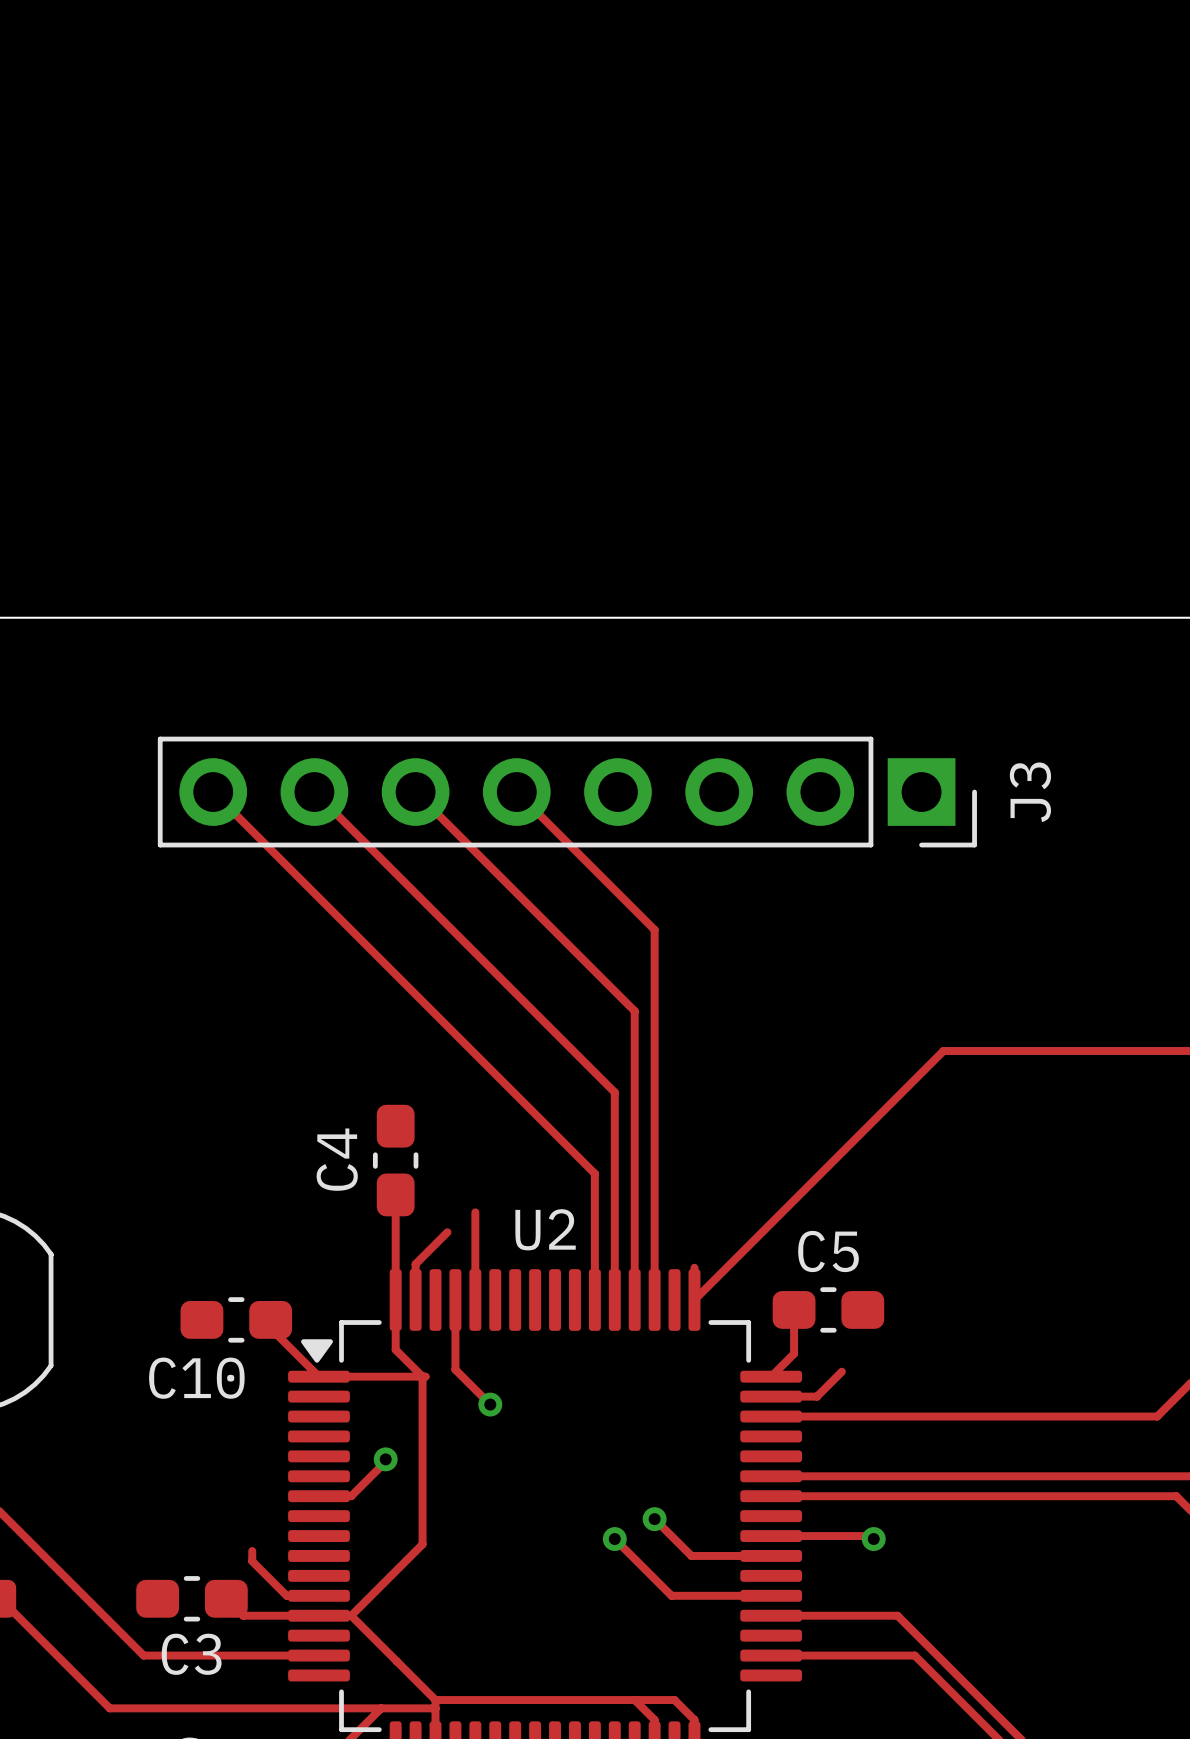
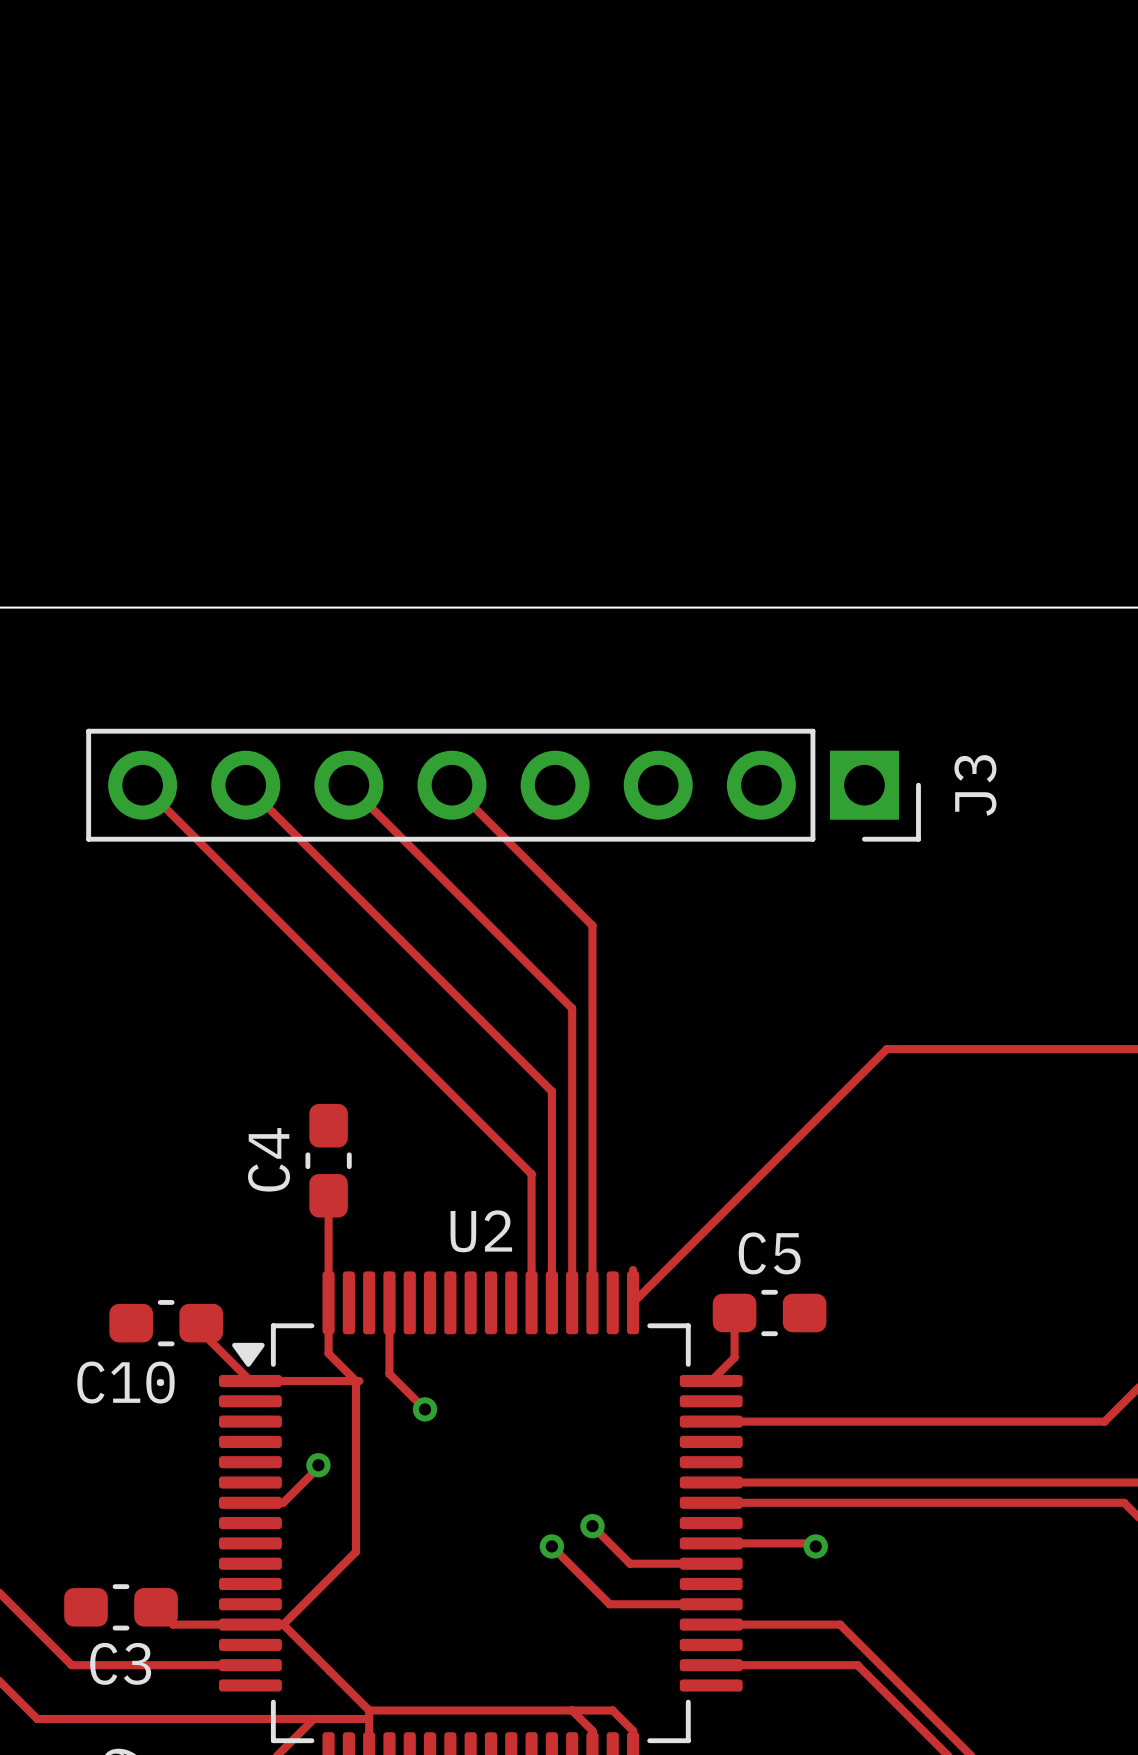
track: (475, 1212) (475, 1299) -> none
track: (447, 1232) (415, 1264) (415, 1299) -> none
track: (841, 1371) (816, 1396) (771, 1396) -> none
track: (252, 1550) (252, 1561) (286, 1595) (318, 1595) -> none

